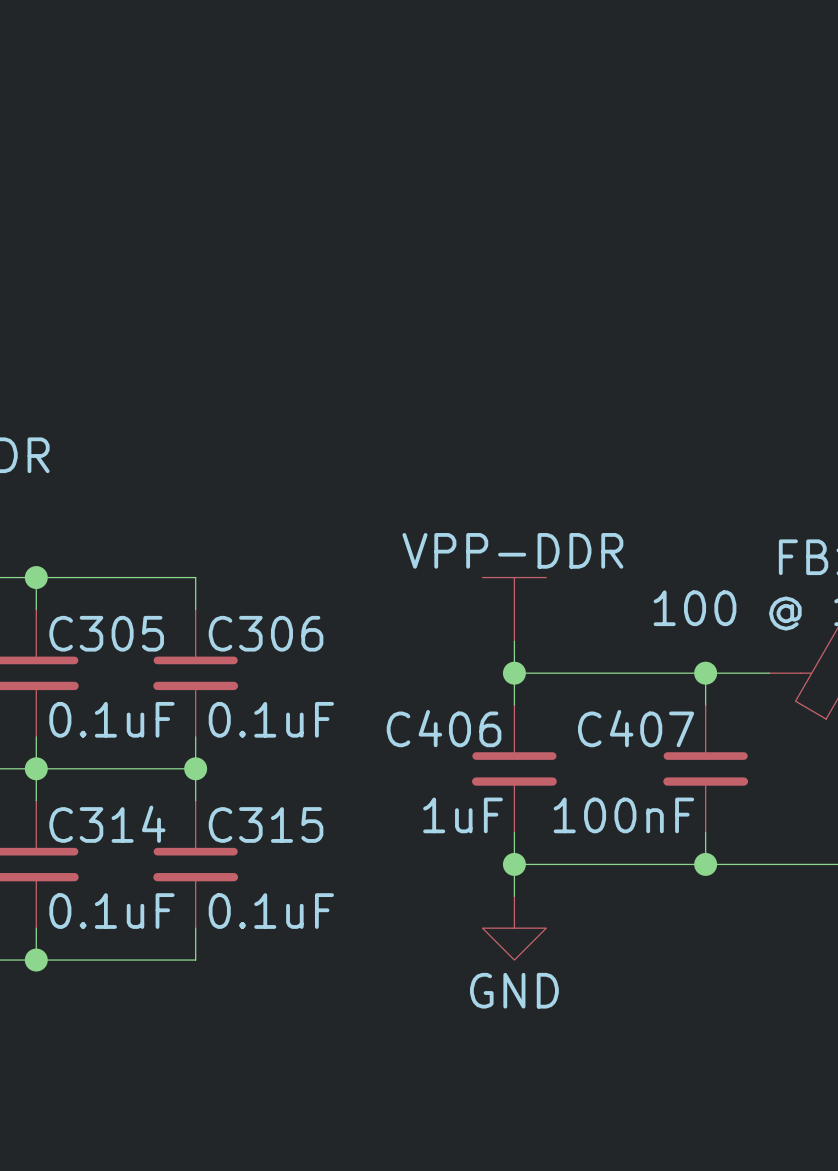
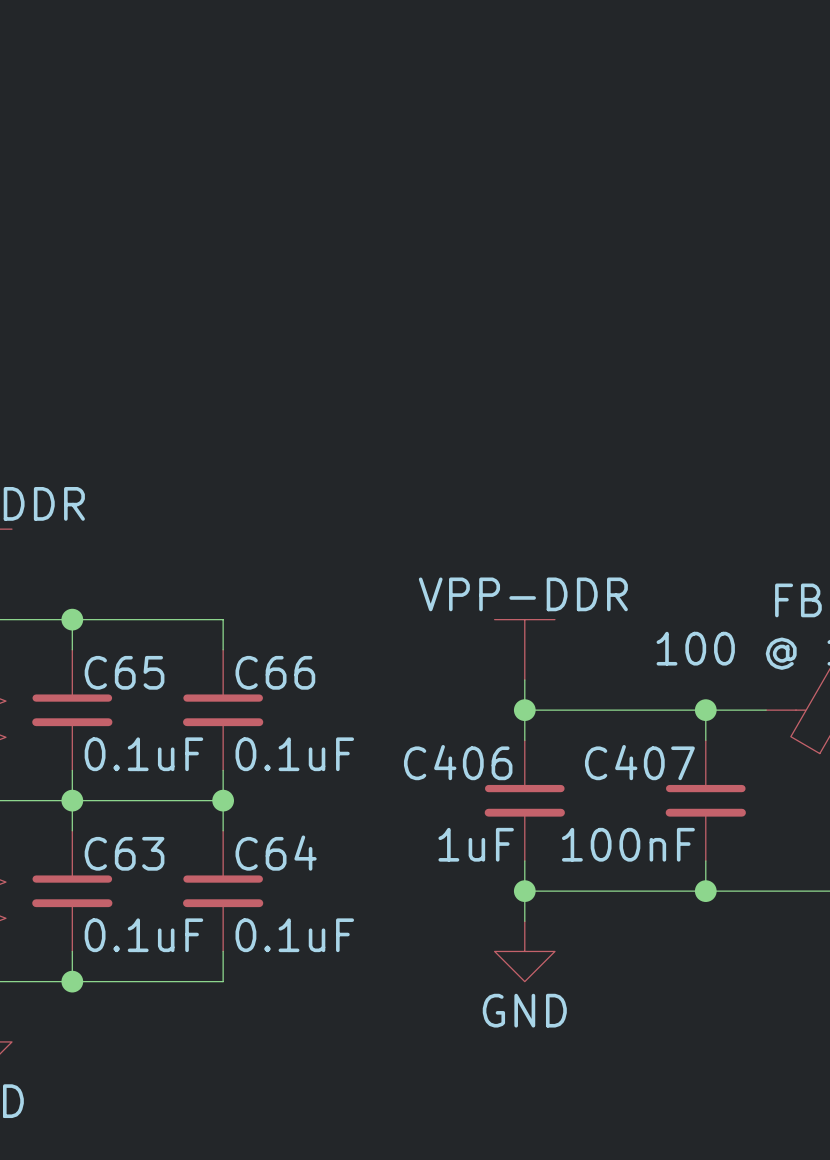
C305 name: C305 (106, 633) -> C65 (124, 672)
C306 name: C306 (266, 633) -> C66 (275, 672)
C314 name: C314 (107, 824) -> C63 (124, 853)
C315 name: C315 (266, 824) -> C64 (276, 853)

